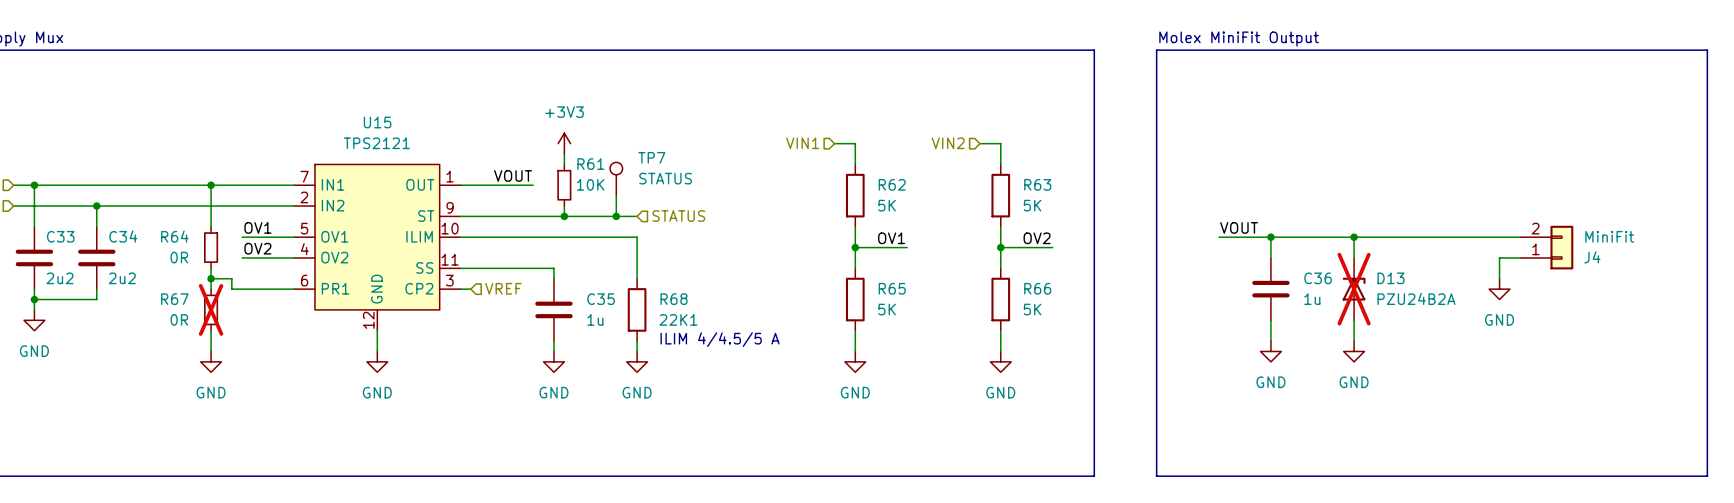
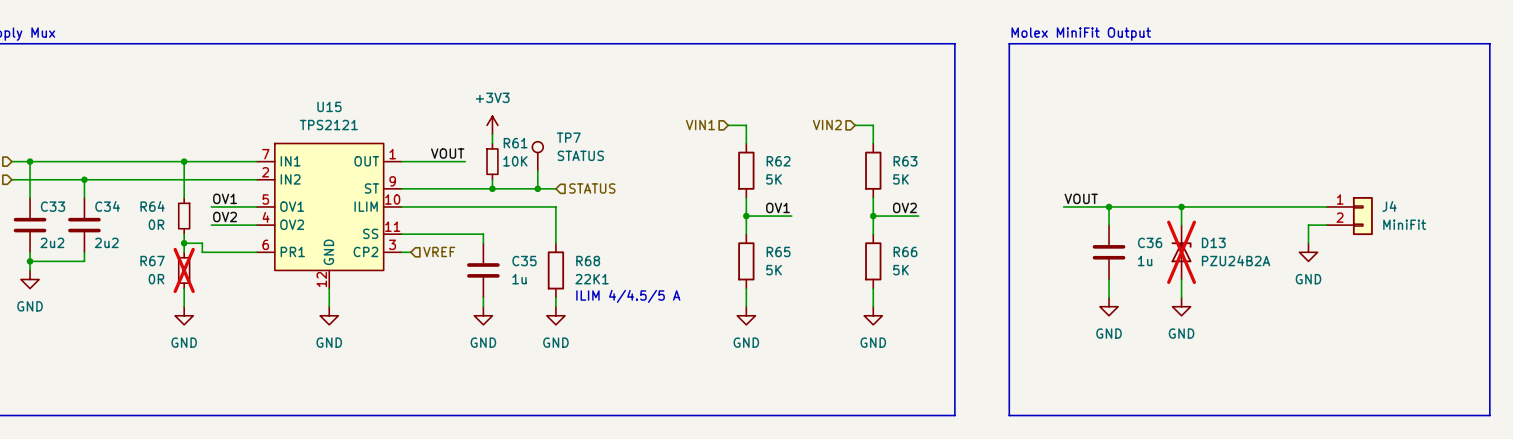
J4 flip: as is (1561, 247) -> up-down (1362, 216)

